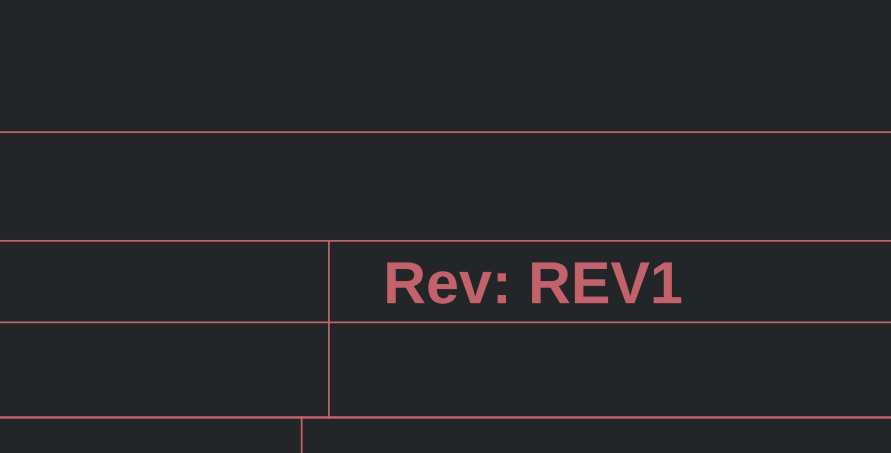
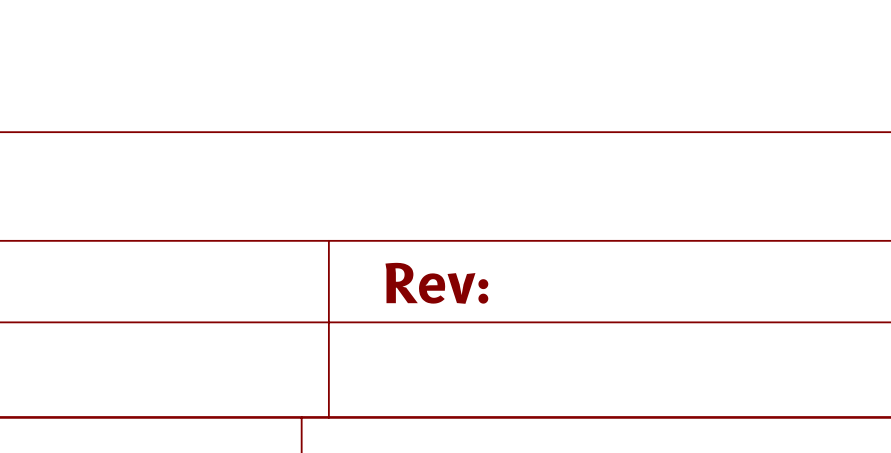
title block: Rev: REV1 (534, 283) -> Rev: (436, 283)

